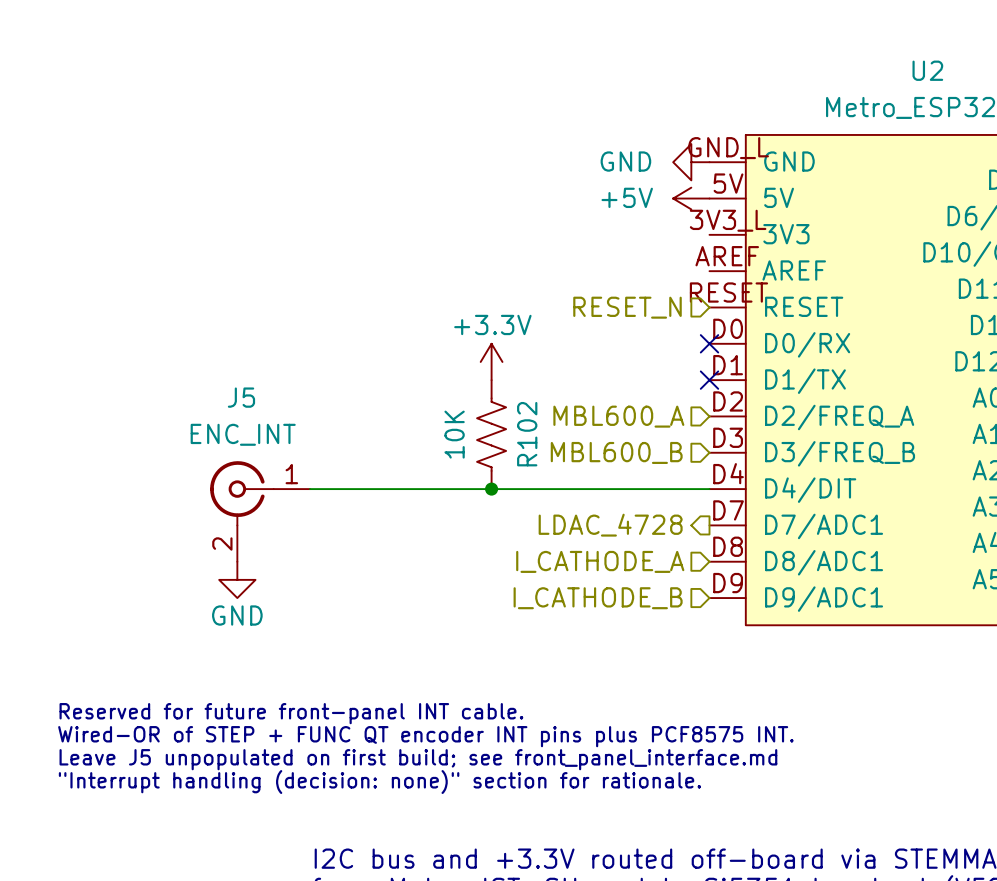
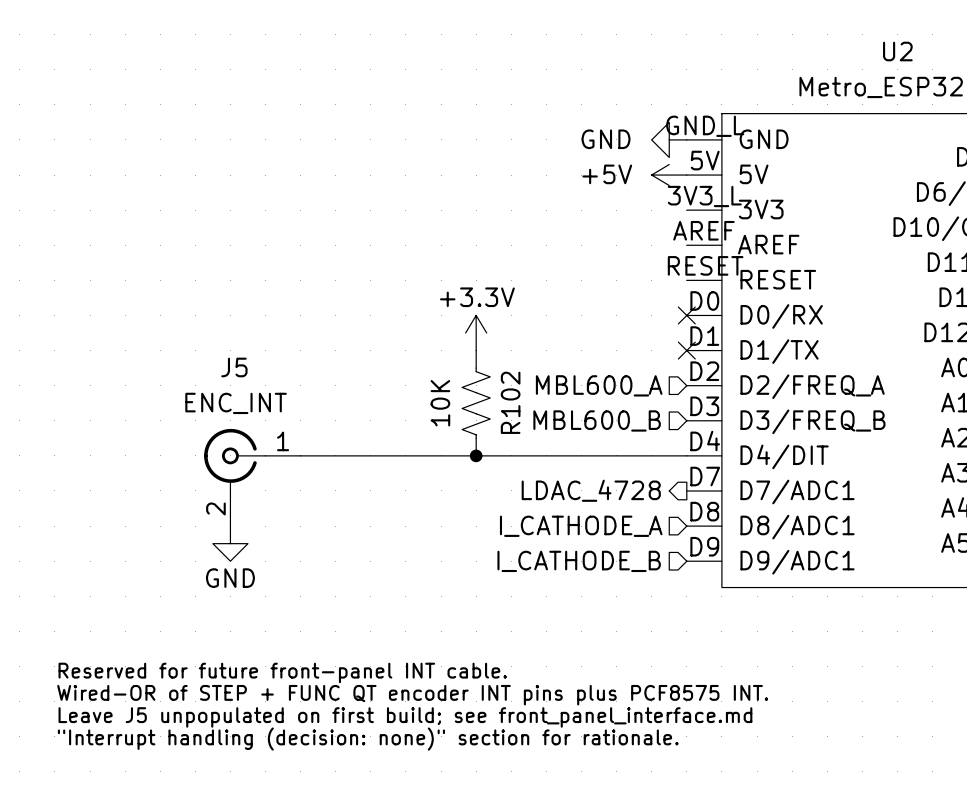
hierarchical label: RESET_N (627, 307) -> none

